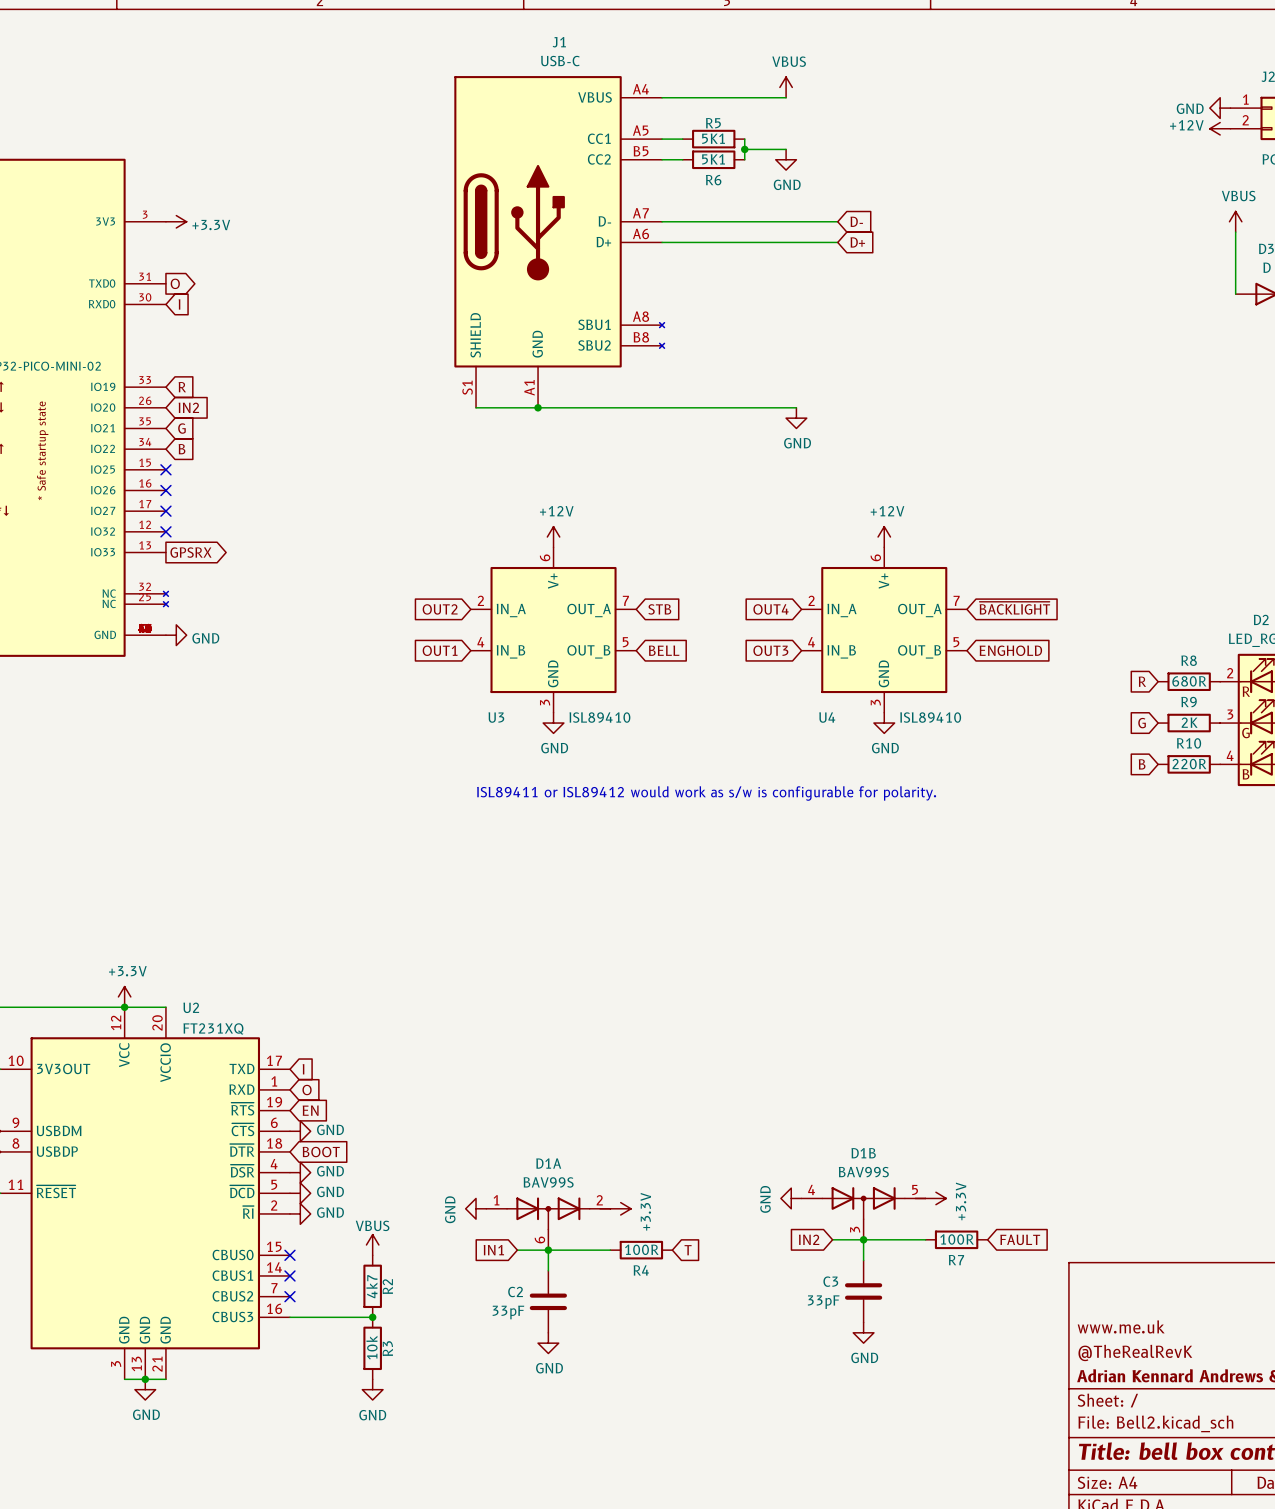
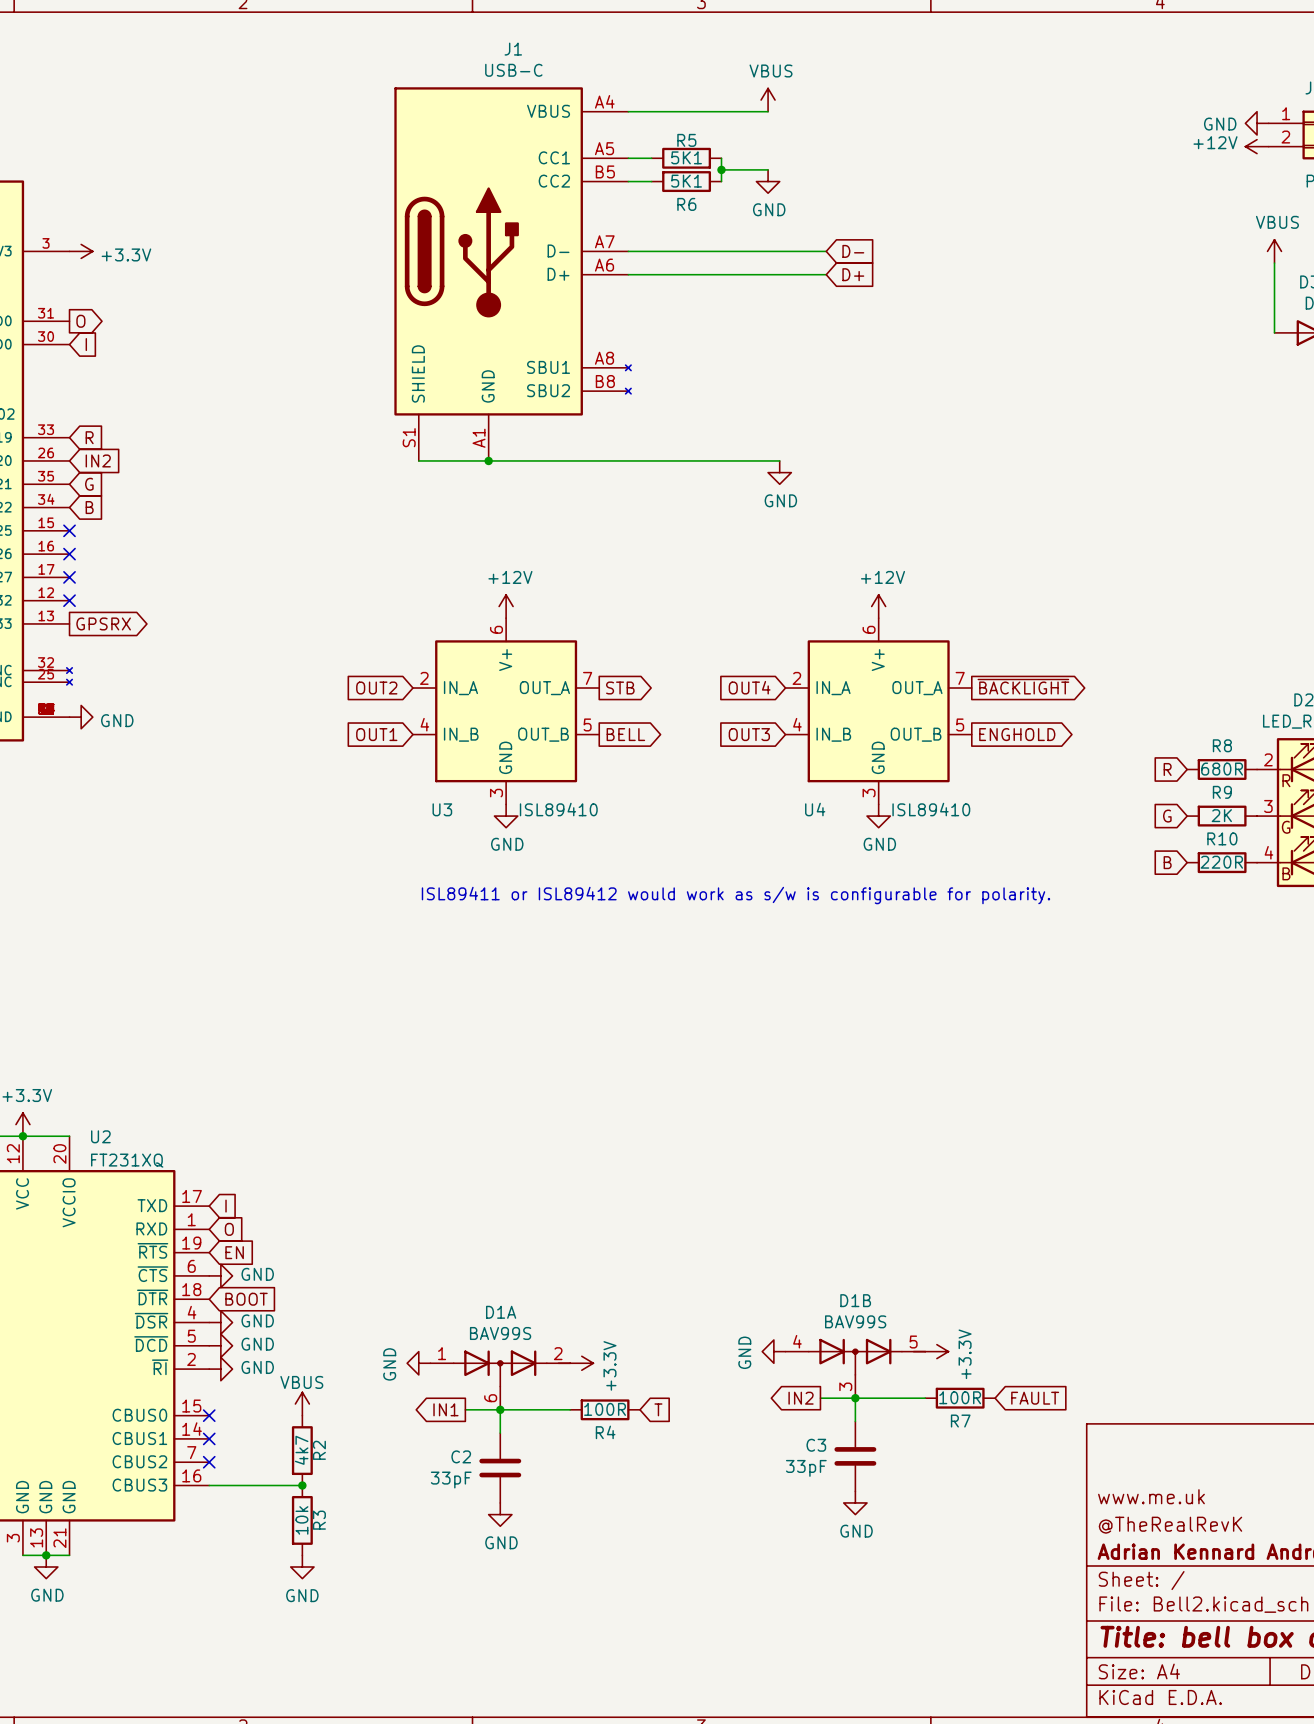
global label shape: input (1014, 608) -> output (1023, 686)
global label shape: input (659, 609) -> output (620, 688)
global label shape: input (664, 650) -> output (625, 734)
global label shape: input (1010, 650) -> output (1017, 734)
global label shape: input (809, 1239) -> output (801, 1398)
global label shape: input (493, 1250) -> output (445, 1409)

